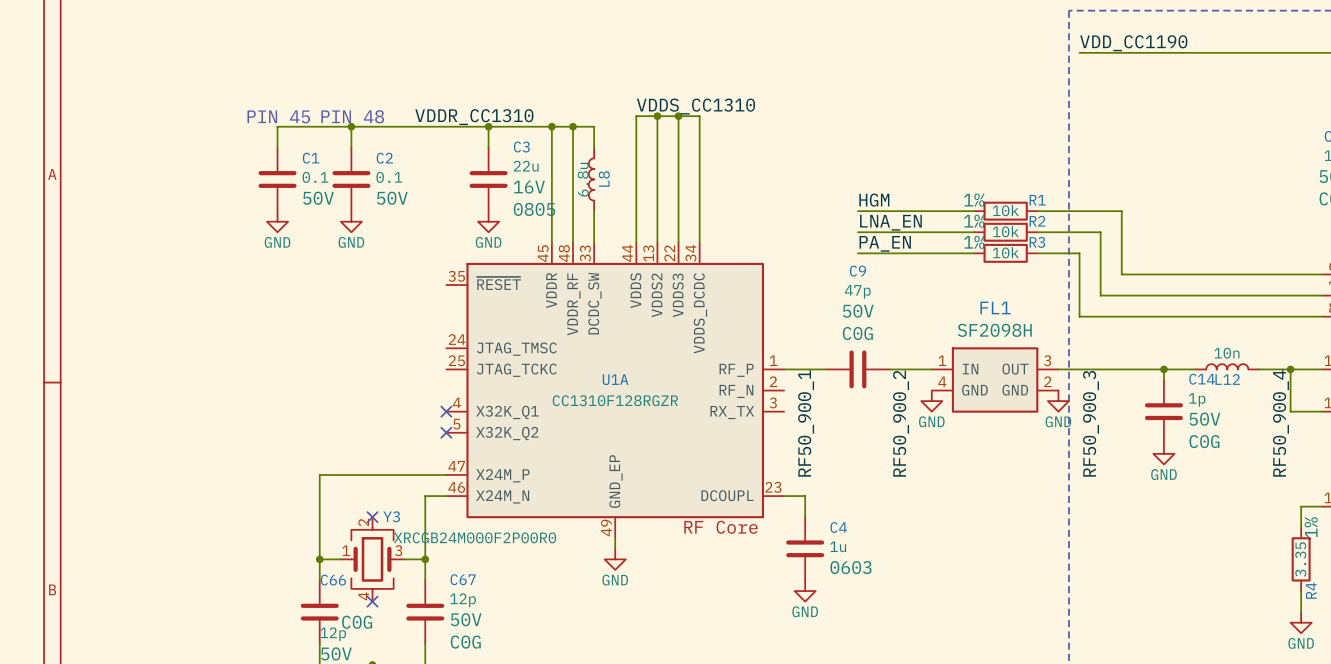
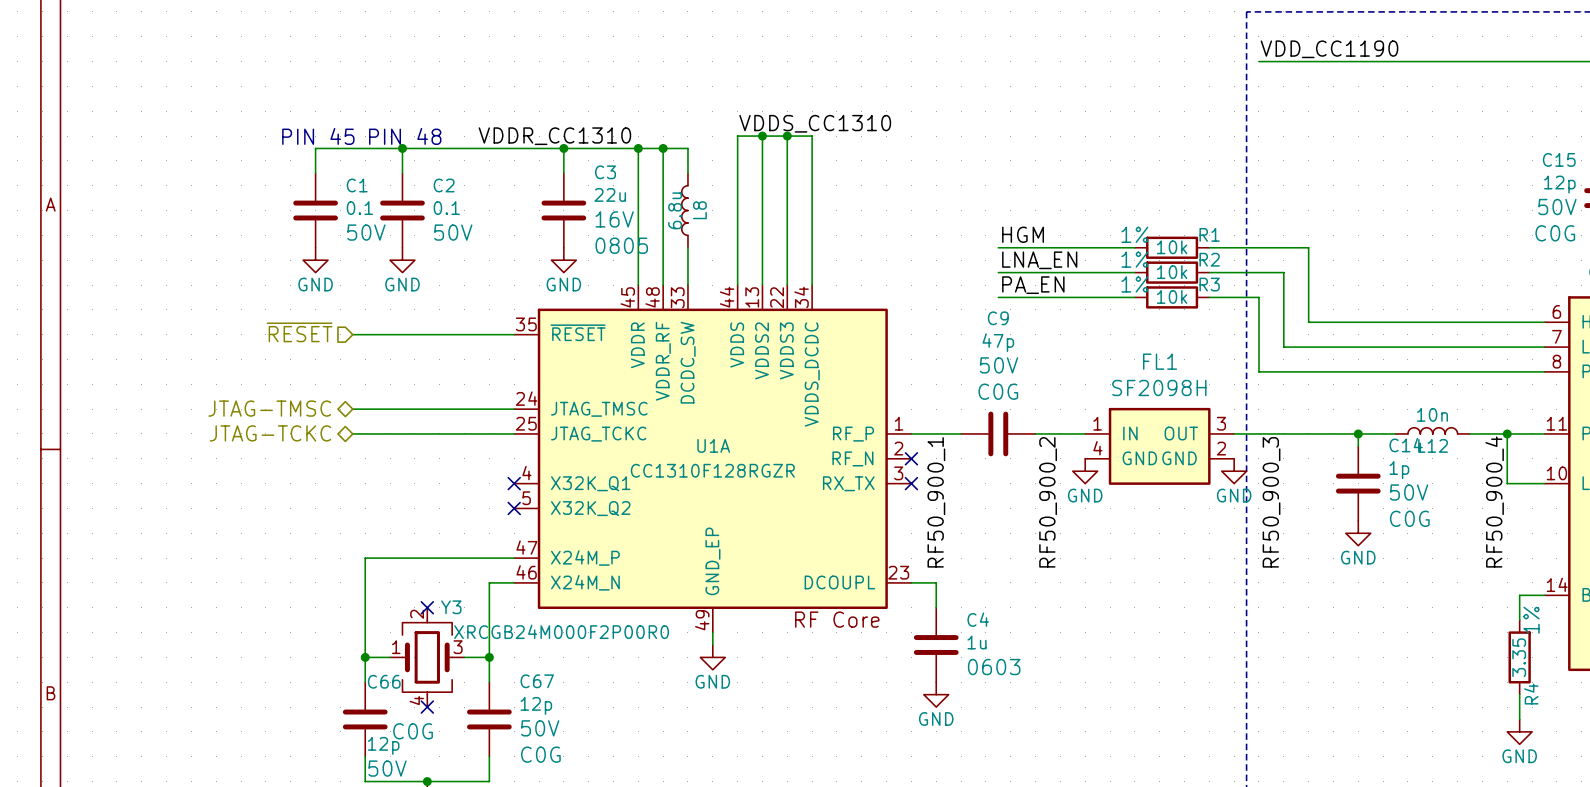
hierarchical label: none -> ~{RESET} (299, 332)
wire: none -> (352, 334) (514, 334)
hierarchical label: none -> JTAG-TMSC (269, 408)
wire: none -> (352, 409) (514, 409)
hierarchical label: none -> JTAG-TCKC (270, 433)
wire: none -> (352, 433) (514, 433)
no-connect mark: none -> (911, 458)
no-connect mark: none -> (911, 483)

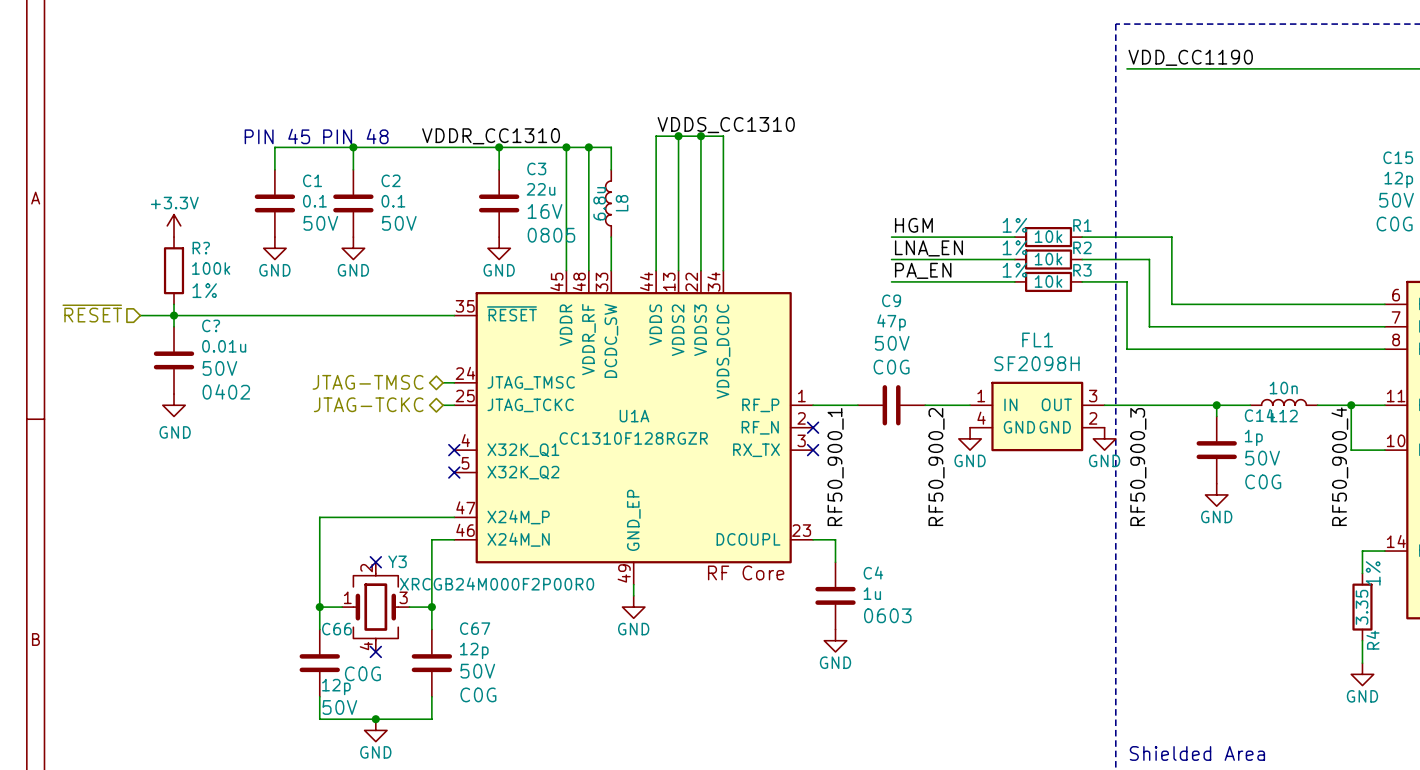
power symbol: none -> +3.3V (174, 225)
R?: none -> 100k (174, 270)
wire: none -> (174, 304) (174, 326)
hierarchical label position: ~{RESET} (299, 332) -> ~{RESET} (92, 313)
wire: none -> (140, 315) (308, 315)
junction: none -> (174, 315)
C?: none -> 0.01u (174, 360)
hierarchical label position: JTAG-TMSC (269, 408) -> JTAG-TMSC (368, 382)
wire: (352, 409) (501, 409) -> none
power symbol: none -> GND (174, 405)
hierarchical label position: JTAG-TCKC (270, 433) -> JTAG-TCKC (368, 404)
wire: (352, 433) (501, 433) -> none

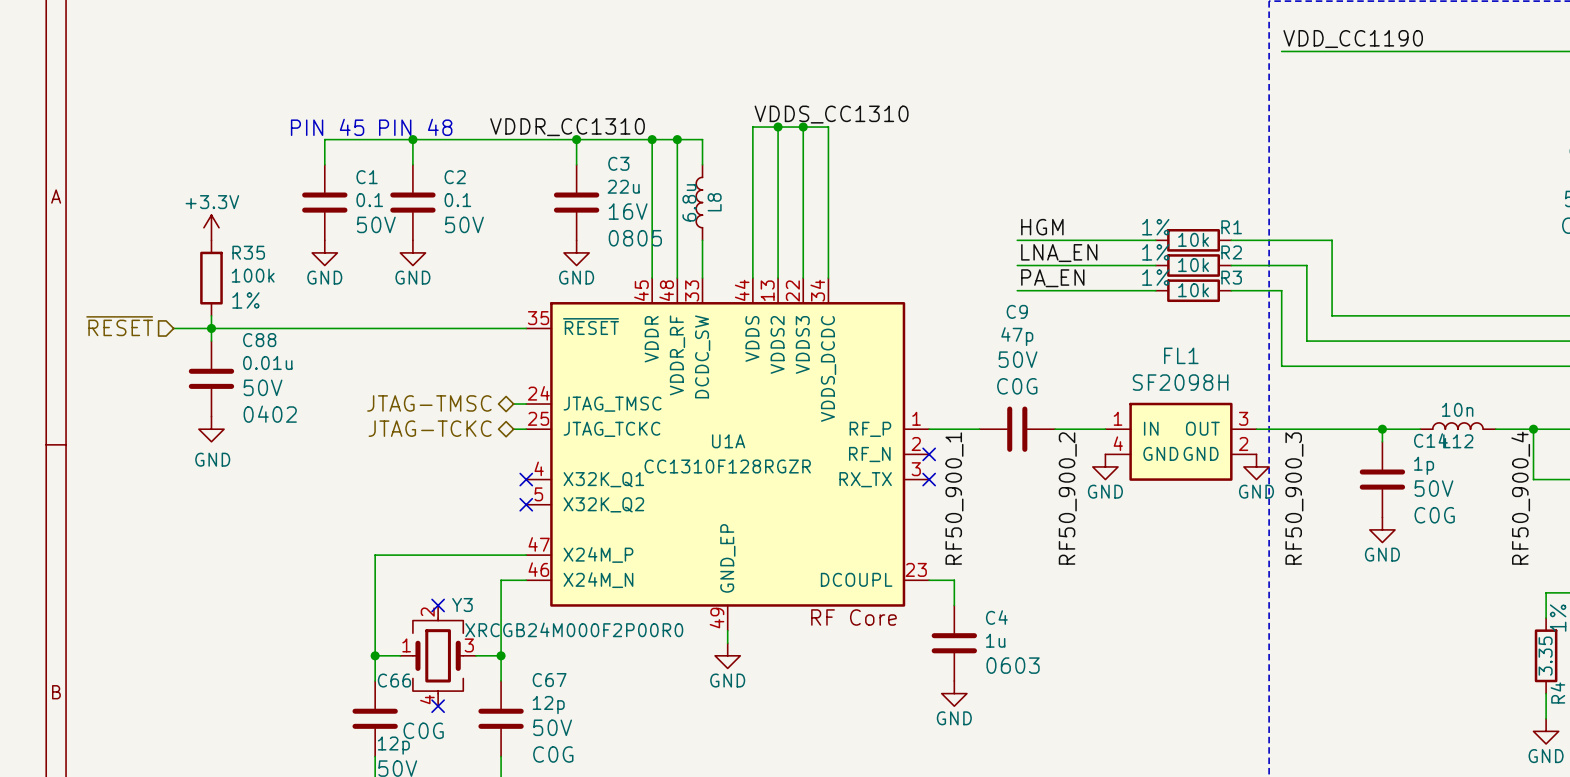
R? name: R? (201, 248) -> R35 (248, 252)
C? name: C? (211, 325) -> C88 (259, 340)

